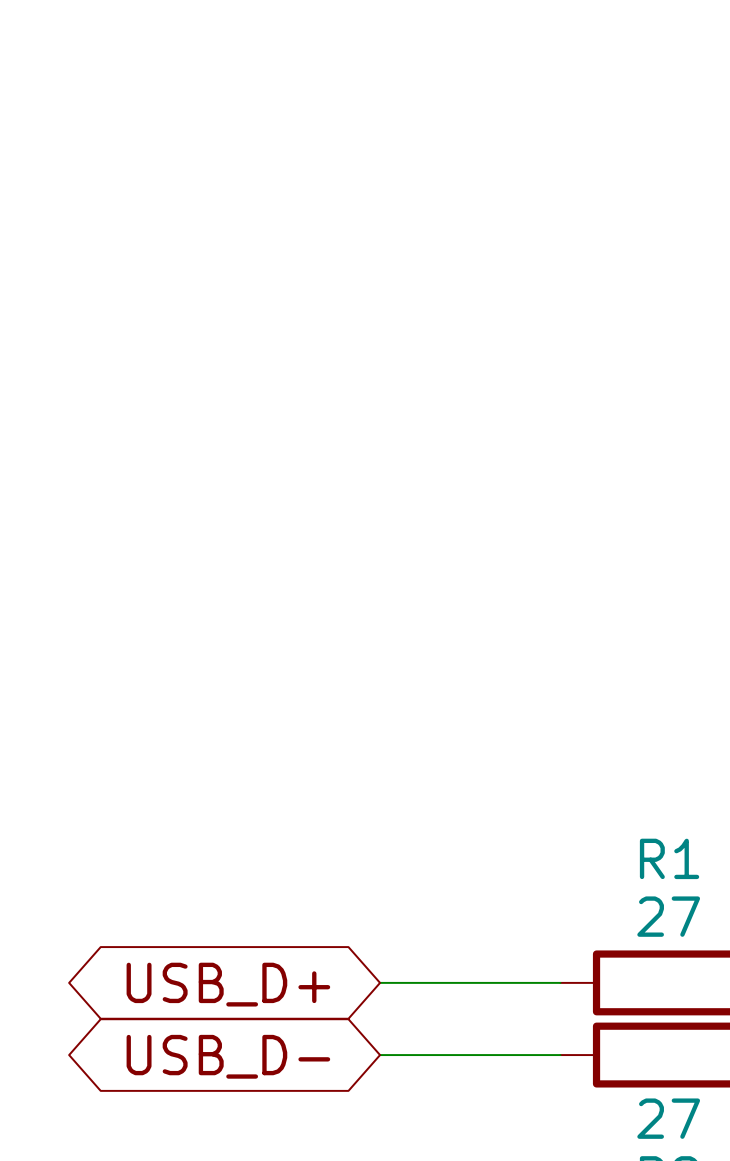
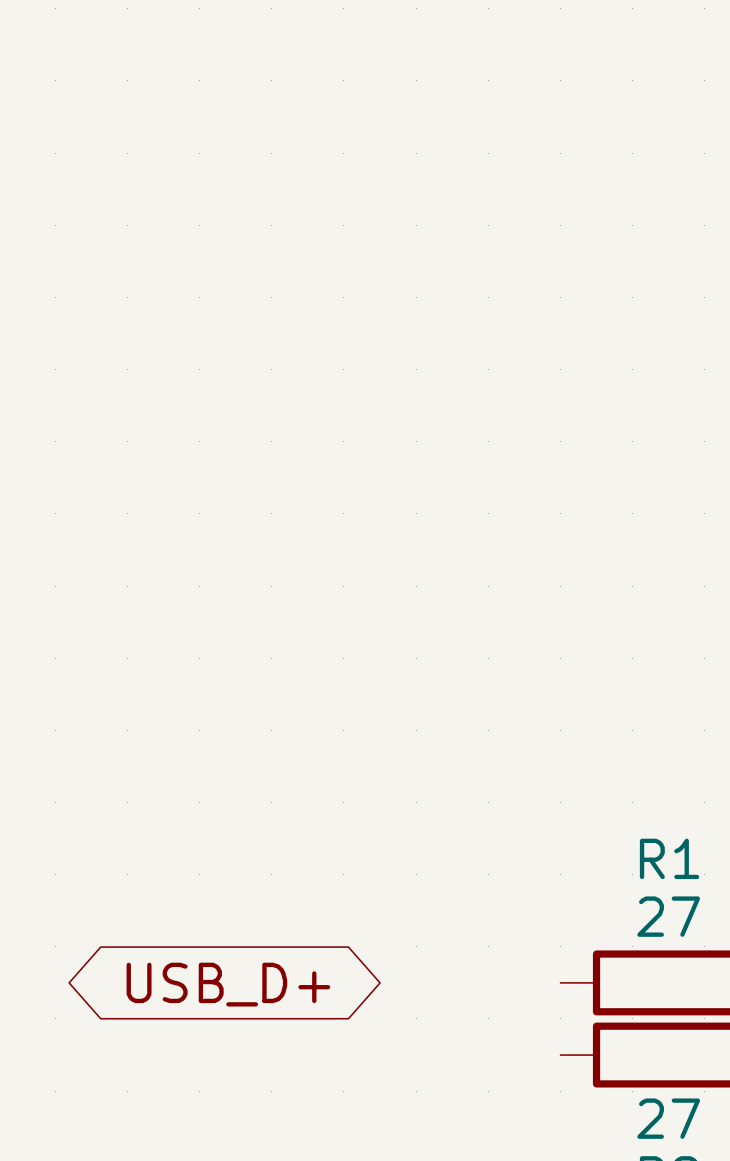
wire: (380, 982) (560, 982) -> none
wire: (380, 1055) (560, 1055) -> none
global label: USB_D- (228, 1056) -> none

